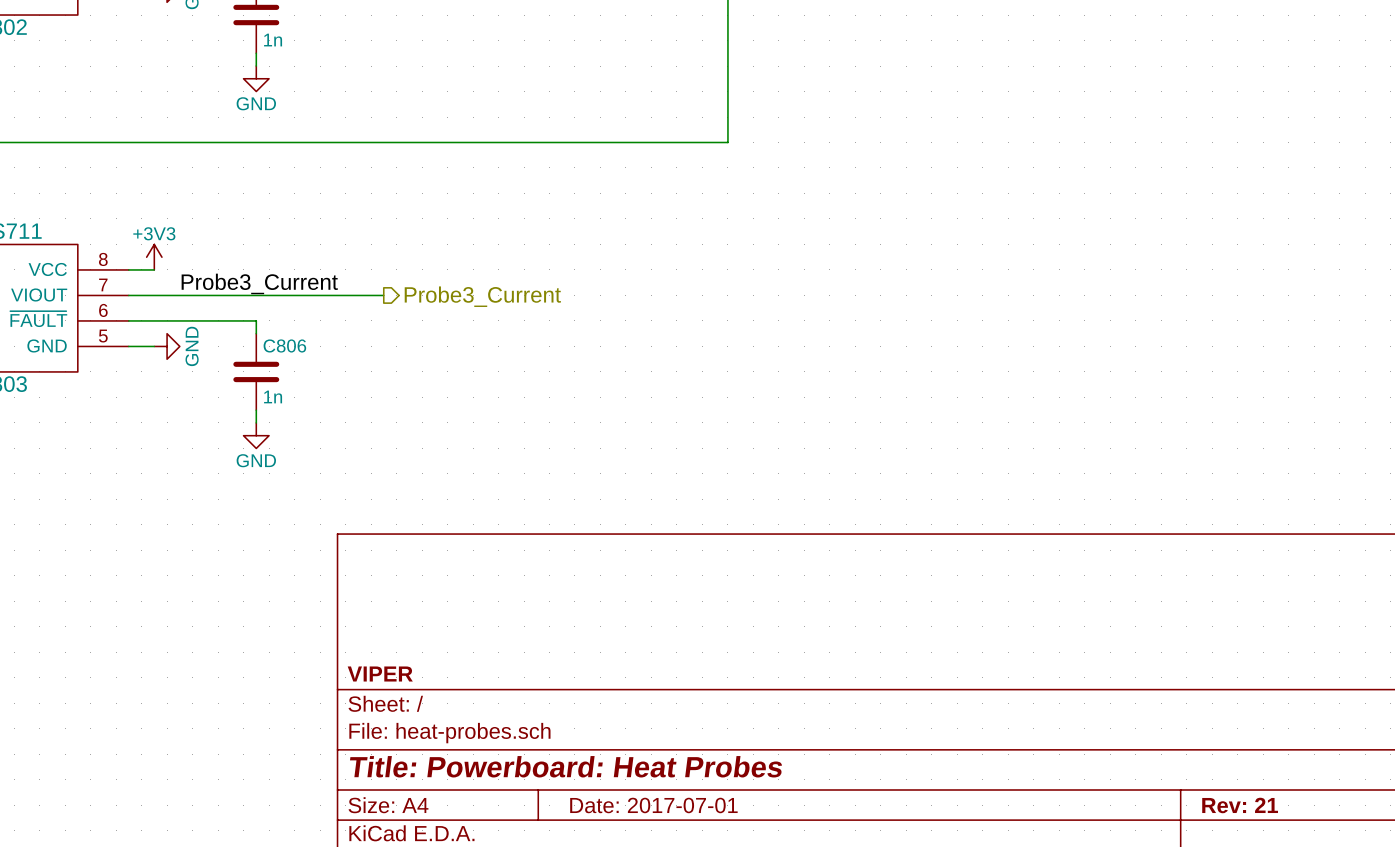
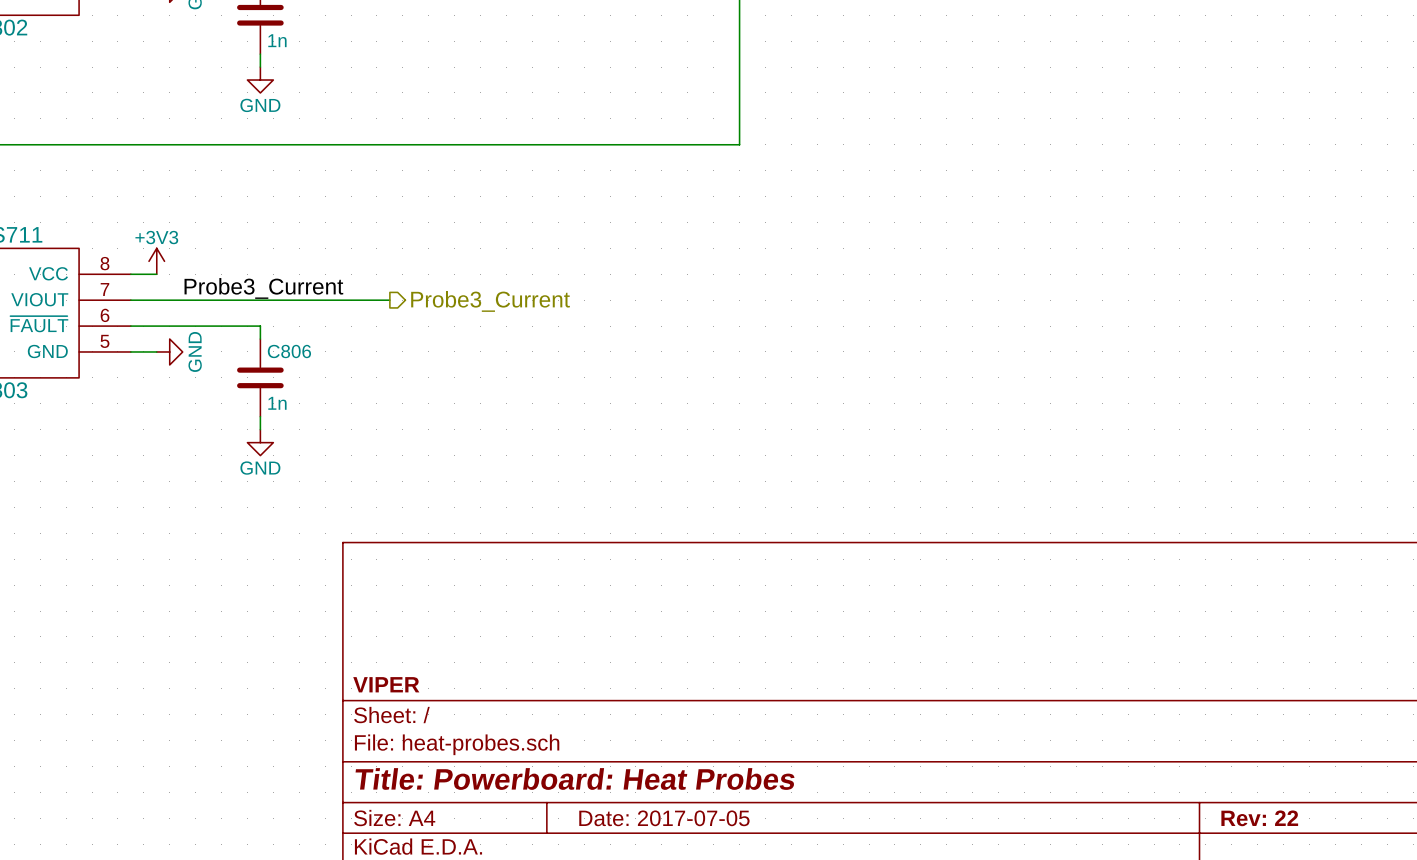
title block: Date: 2017-07-01 (653, 805) -> Date: 2017-07-05 (664, 818)
title block: Rev: 21 (1240, 805) -> Rev: 22 (1259, 818)

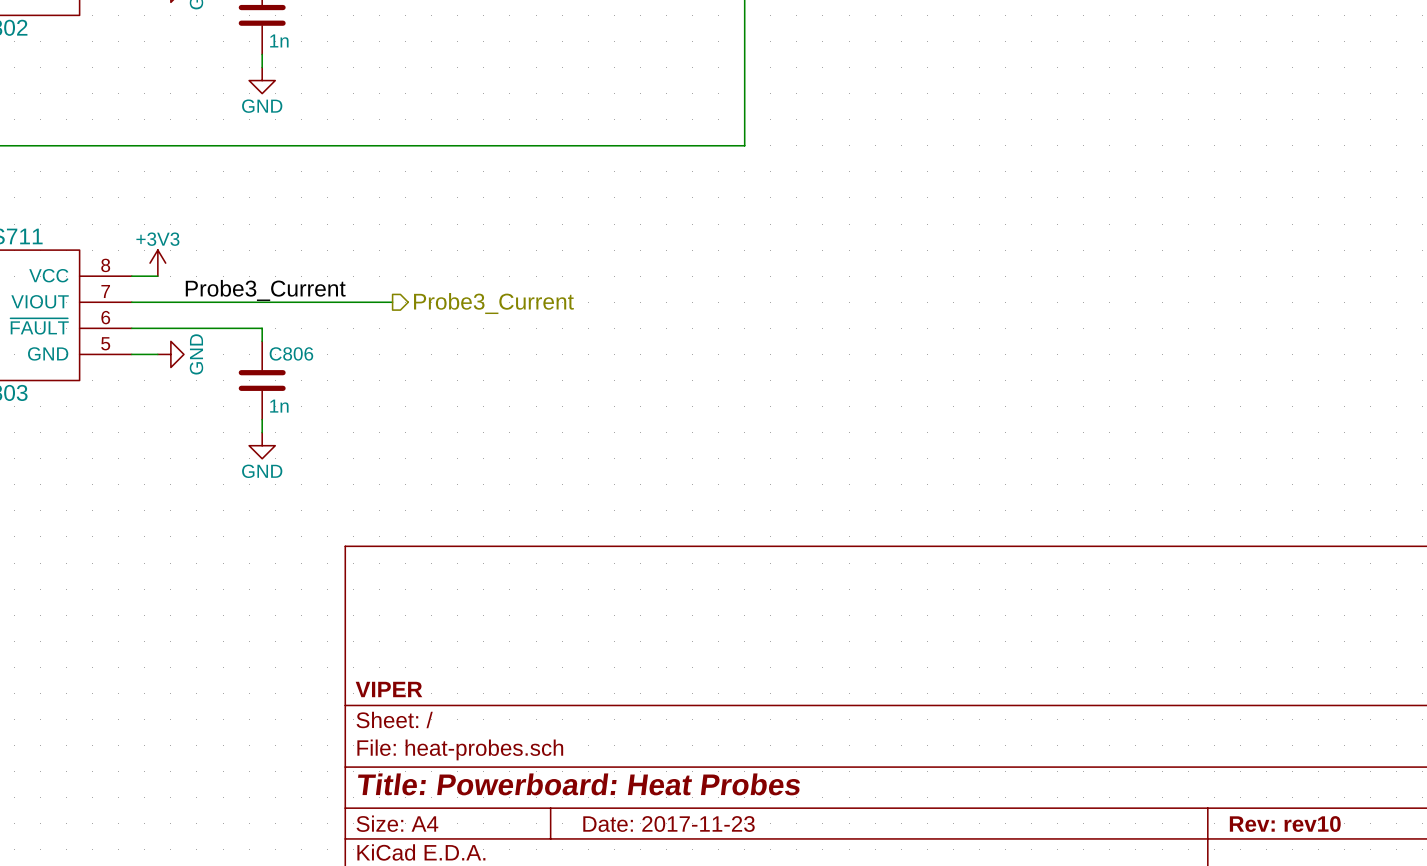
title block: Date: 2017-07-05 (664, 818) -> Date: 2017-11-23 (669, 824)
title block: Rev: 22 (1259, 818) -> Rev: rev10 (1285, 824)

